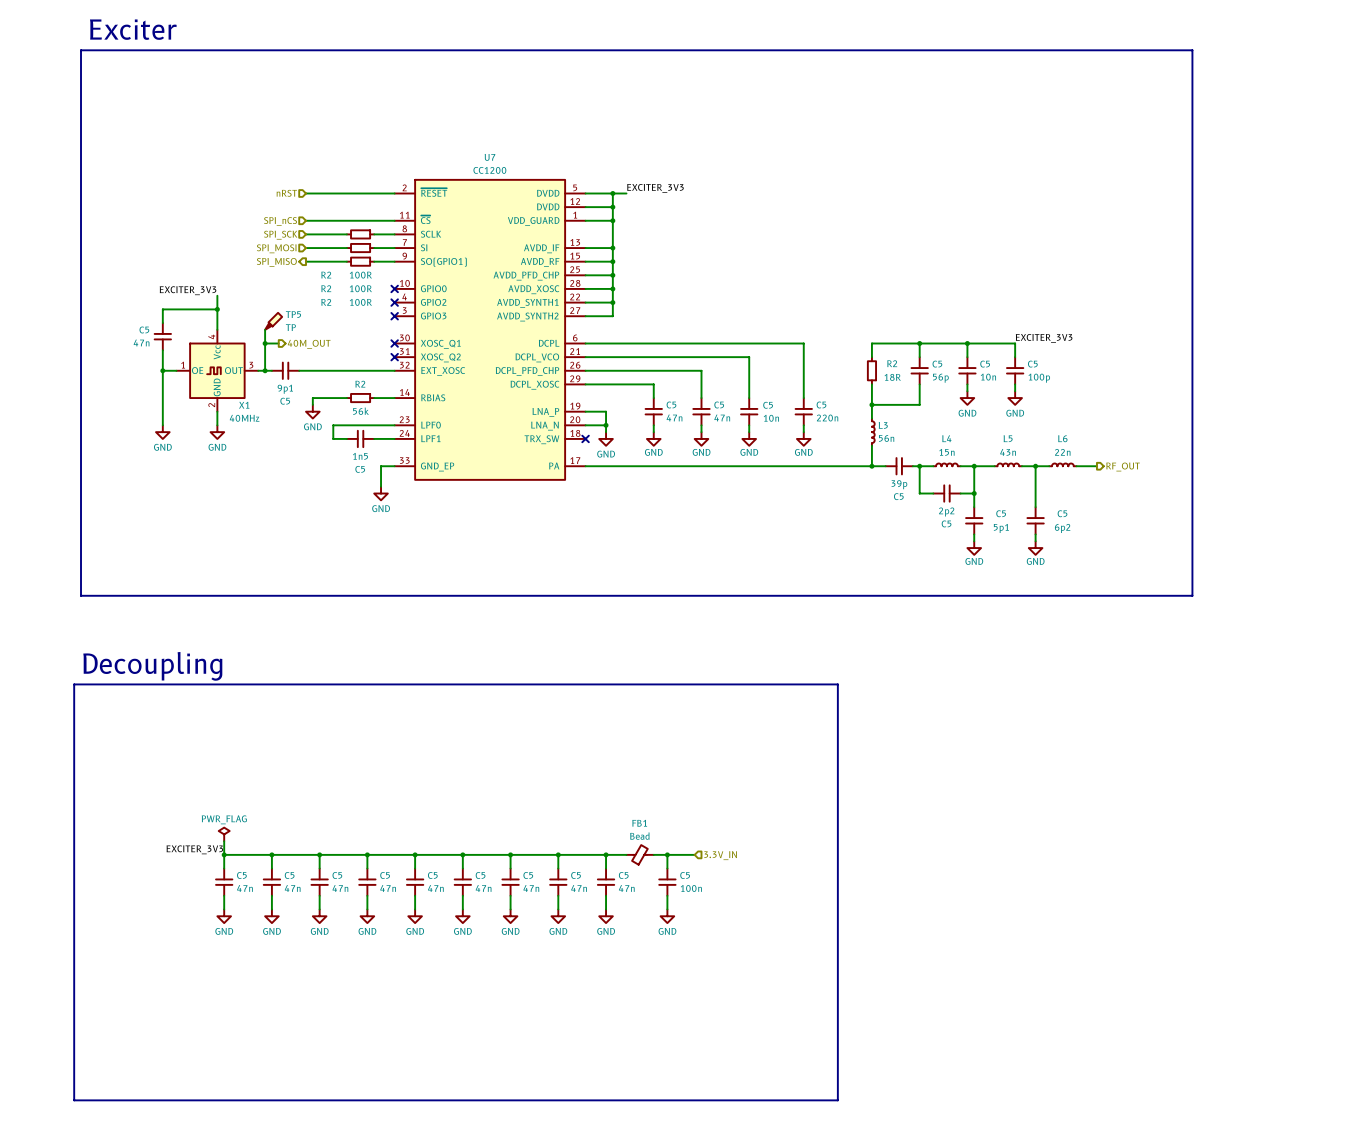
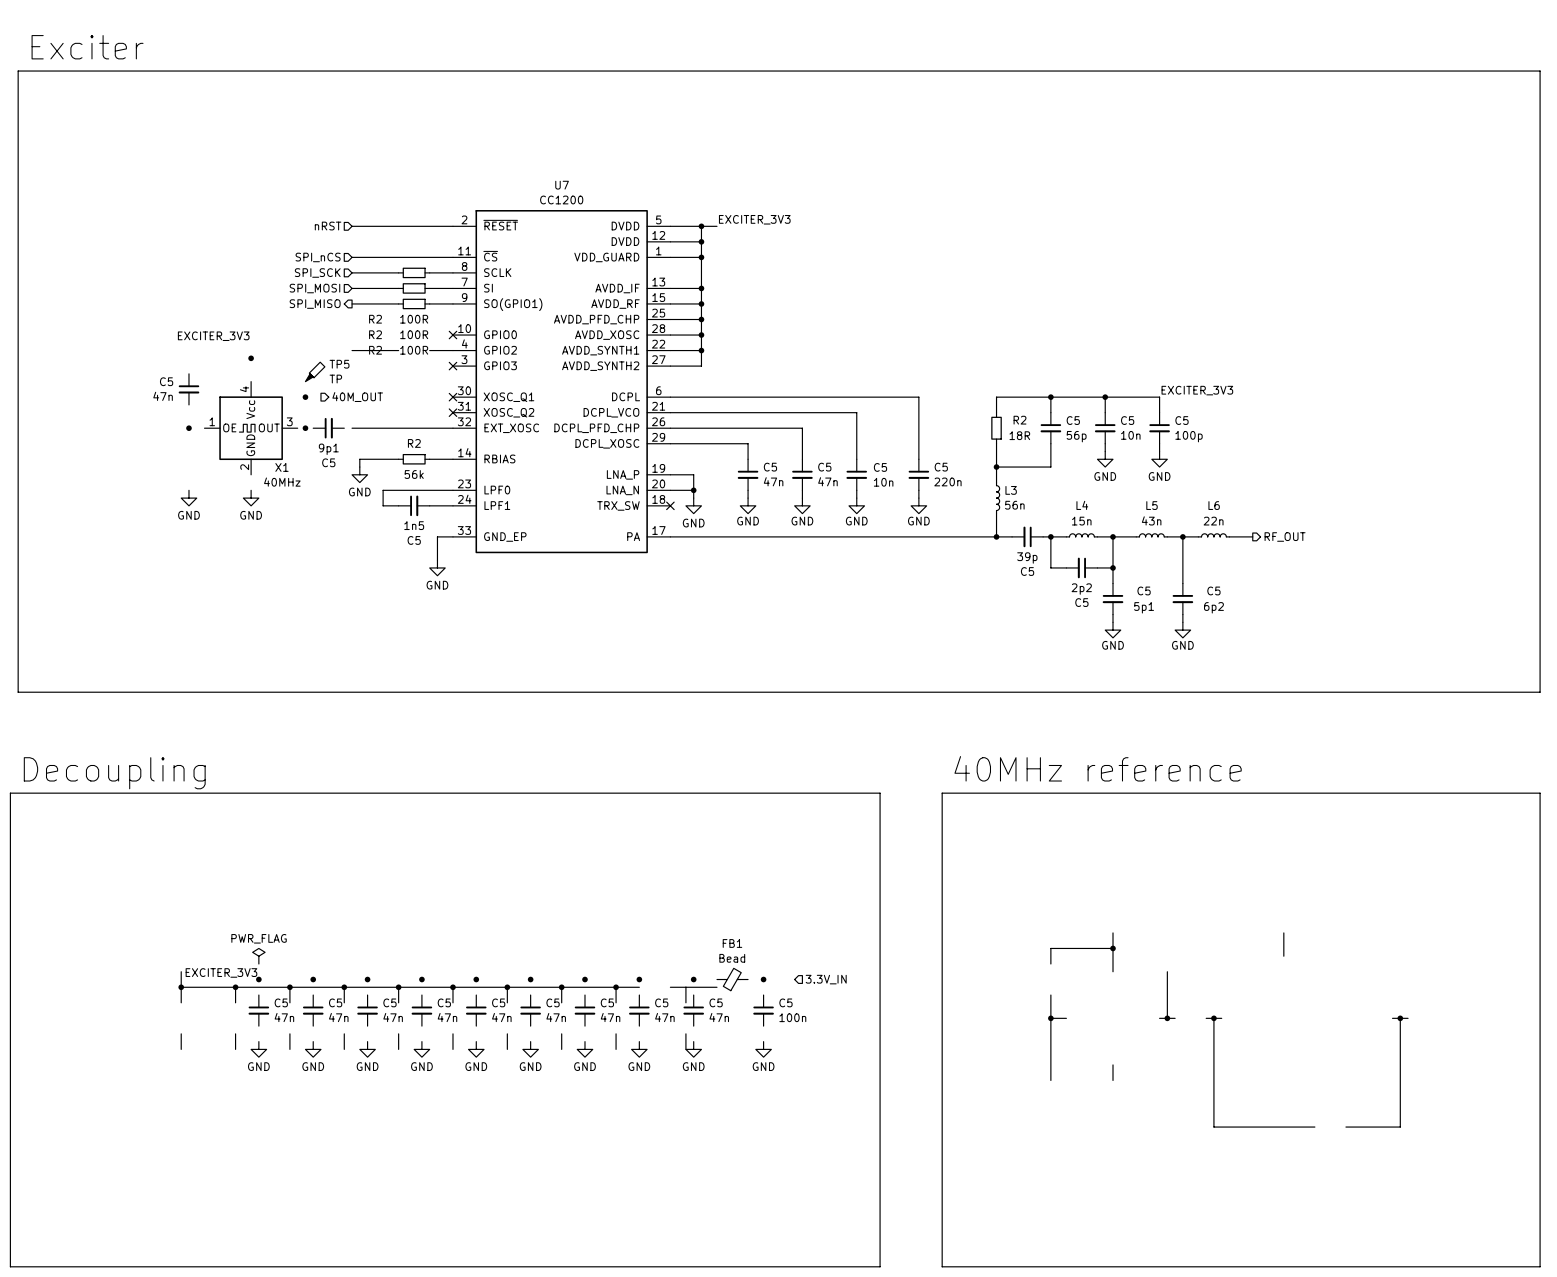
text position: Exciter (133, 29) -> Exciter (87, 47)
line: (81, 50) (1192, 50) (1192, 595) (81, 595) (81, 50) -> (18, 71) (18, 692) (1540, 692) (1540, 71) (18, 71)
wire: (217, 295) (217, 329) -> none
wire: none -> (352, 350) (398, 350)
wire: none -> (429, 350) (452, 350)
no-connect mark: (394, 302) -> none
wire: (217, 309) (162, 309) (162, 323) -> none
wire: (265, 329) (265, 370) -> none
wire: (265, 343) (278, 343) -> none
wire: (162, 350) (162, 425) -> none
wire: (162, 370) (176, 370) -> none
wire: (258, 370) (271, 370) -> none
wire: (299, 370) (306, 370) -> none
wire: (217, 411) (217, 425) -> none
text position: Decoupling (152, 666) -> Decoupling (114, 773)
text: none -> 40MHz reference (1098, 768)
line: (74, 684) (837, 684) (837, 1100) (74, 1100) (74, 684) -> (10, 793) (880, 793) (880, 1266) (10, 1266) (10, 793)
line: none -> (942, 793) (1540, 793) (1540, 1266) (942, 1266) (942, 793)
wire: none -> (1113, 932) (1113, 971)
wire: none -> (1283, 932) (1283, 956)
wire: none -> (1113, 948) (1050, 948) (1050, 963)
junction: none -> (1113, 948)
wire: (224, 841) (224, 868) -> (181, 971) (181, 1002)
wire: none -> (1167, 971) (1167, 1018)
wire: (224, 854) (626, 854) -> (181, 987) (639, 987)
wire: (271, 854) (271, 868) -> (235, 987) (235, 1002)
wire: (319, 854) (319, 868) -> (289, 987) (289, 1002)
wire: (367, 854) (367, 868) -> (344, 987) (344, 1002)
wire: (415, 854) (415, 868) -> (398, 987) (398, 1002)
wire: (462, 854) (462, 868) -> (452, 987) (452, 1002)
wire: (510, 854) (510, 868) -> (507, 987) (507, 1002)
wire: (558, 854) (558, 868) -> (561, 987) (561, 1002)
wire: (606, 854) (606, 868) -> (616, 987) (616, 1002)
wire: (653, 854) (694, 854) -> (670, 987) (716, 987)
wire: (667, 854) (667, 868) -> (685, 987) (685, 1002)
junction: none -> (181, 987)
junction: none -> (235, 987)
junction: none -> (289, 987)
junction: none -> (344, 987)
junction: none -> (398, 987)
junction: none -> (452, 987)
junction: none -> (507, 987)
junction: none -> (561, 987)
junction: none -> (616, 987)
wire: none -> (1050, 995) (1050, 1080)
wire: none -> (1050, 1018) (1066, 1018)
junction: none -> (1050, 1018)
wire: none -> (1159, 1018) (1175, 1018)
junction: none -> (1167, 1018)
wire: none -> (1206, 1018) (1221, 1018)
wire: none -> (1213, 1018) (1213, 1127) (1314, 1127)
junction: none -> (1213, 1018)
wire: none -> (1392, 1018) (1408, 1018)
wire: none -> (1400, 1018) (1400, 1127) (1345, 1127)
junction: none -> (1400, 1018)
wire: (224, 895) (224, 909) -> (181, 1033) (181, 1049)
wire: (271, 895) (271, 909) -> (235, 1033) (235, 1049)
wire: (319, 895) (319, 909) -> (289, 1033) (289, 1049)
wire: (367, 895) (367, 909) -> (344, 1033) (344, 1049)
wire: (415, 895) (415, 909) -> (398, 1033) (398, 1049)
wire: (462, 895) (462, 909) -> (452, 1033) (452, 1049)
wire: (510, 895) (510, 909) -> (507, 1033) (507, 1049)
wire: (558, 895) (558, 909) -> (561, 1033) (561, 1049)
wire: (606, 895) (606, 909) -> (616, 1033) (616, 1049)
wire: (667, 895) (667, 909) -> (685, 1033) (685, 1049)
wire: none -> (1113, 1064) (1113, 1080)

